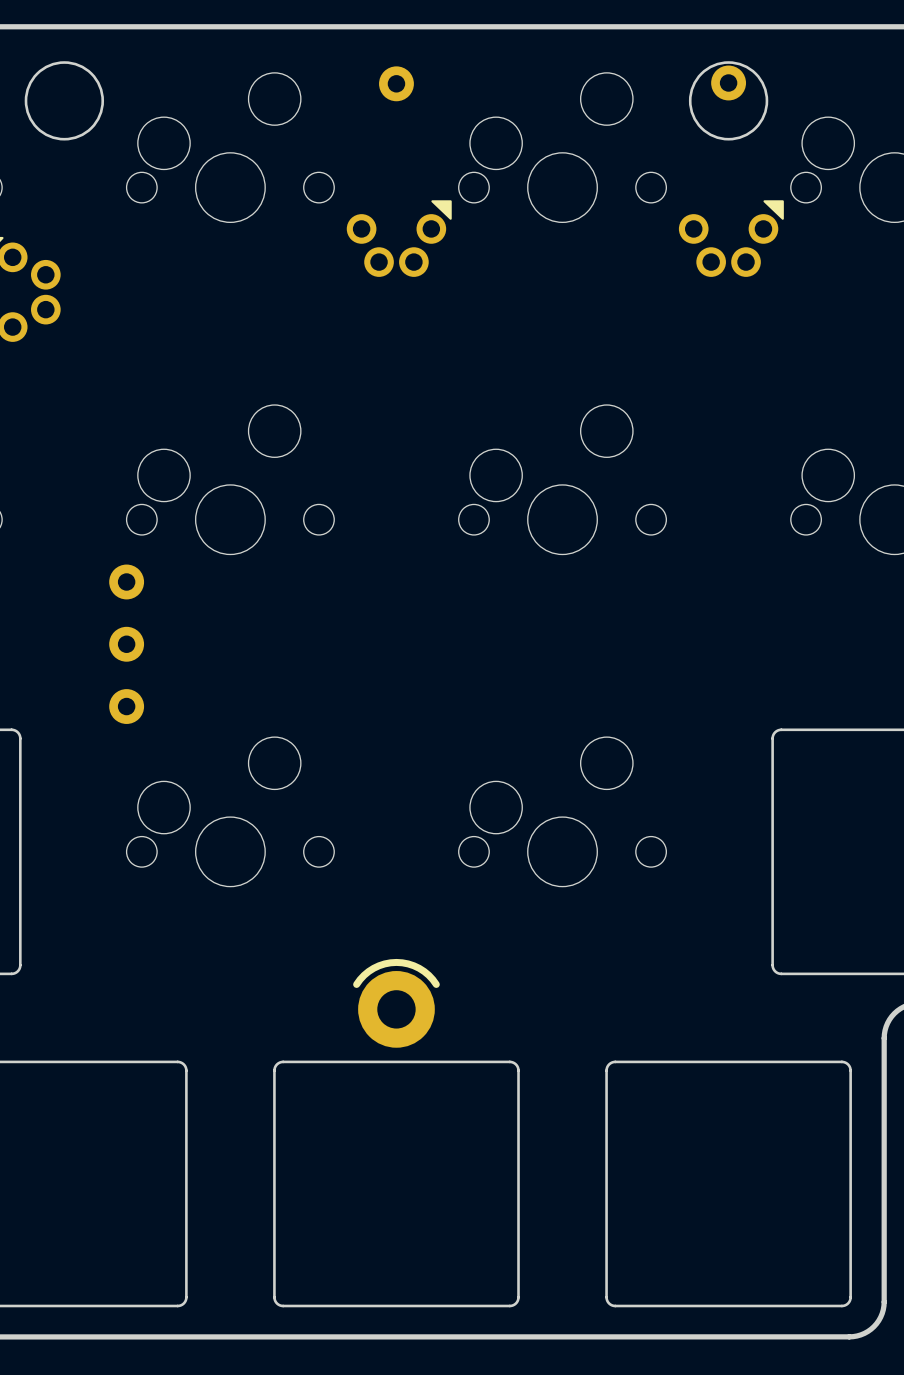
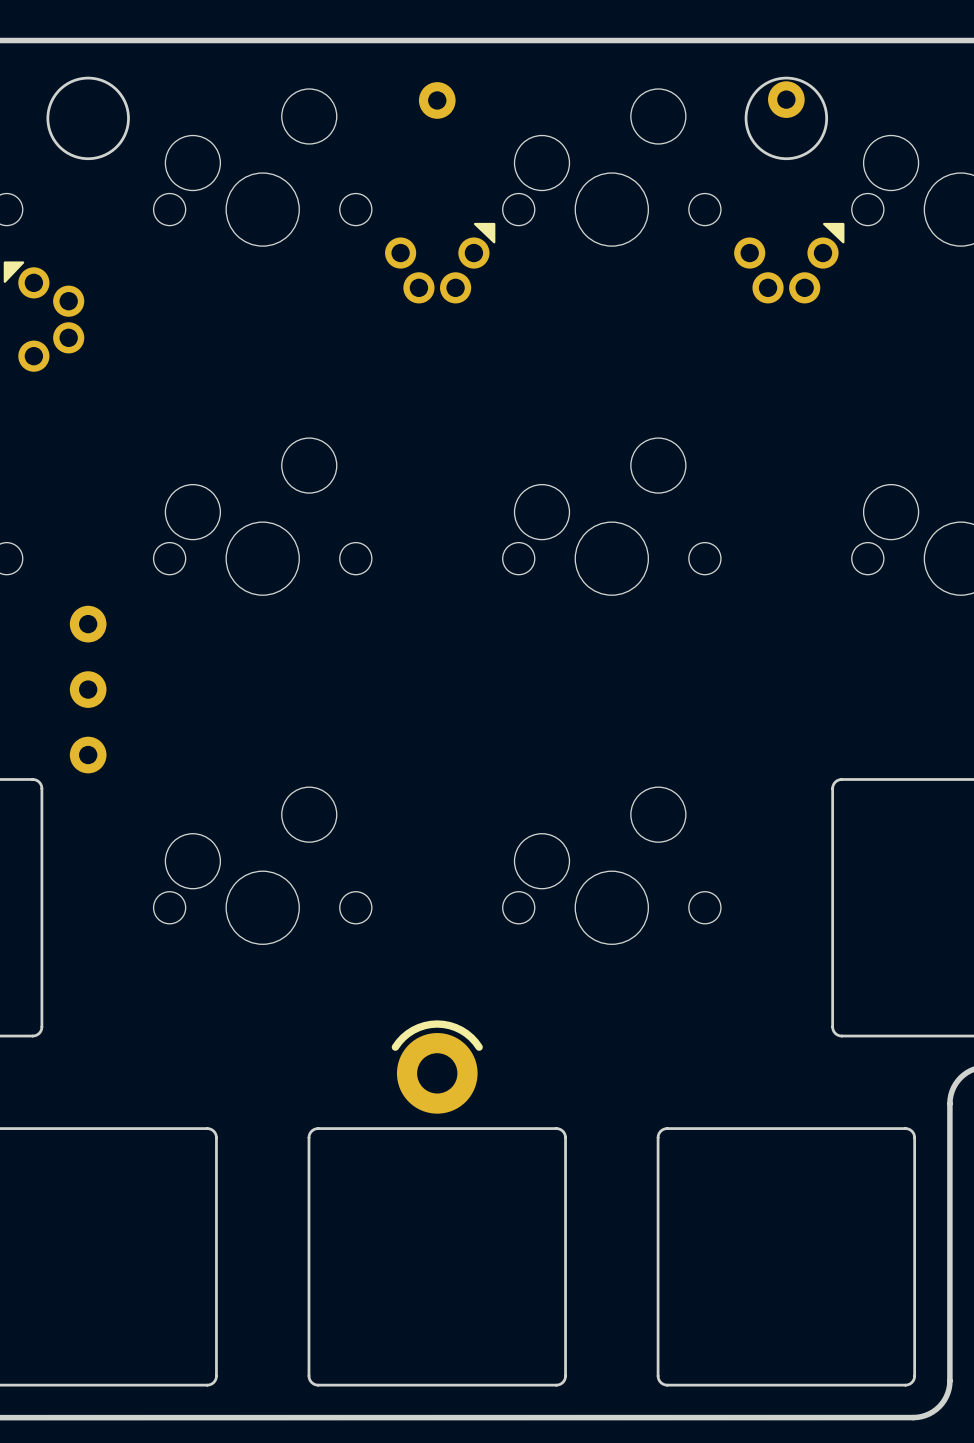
part: none -> (88, 624)
part: (126, 581) -> none
part: none -> (88, 689)
part: (126, 644) -> none
part: none -> (88, 755)
part: (126, 706) -> none

